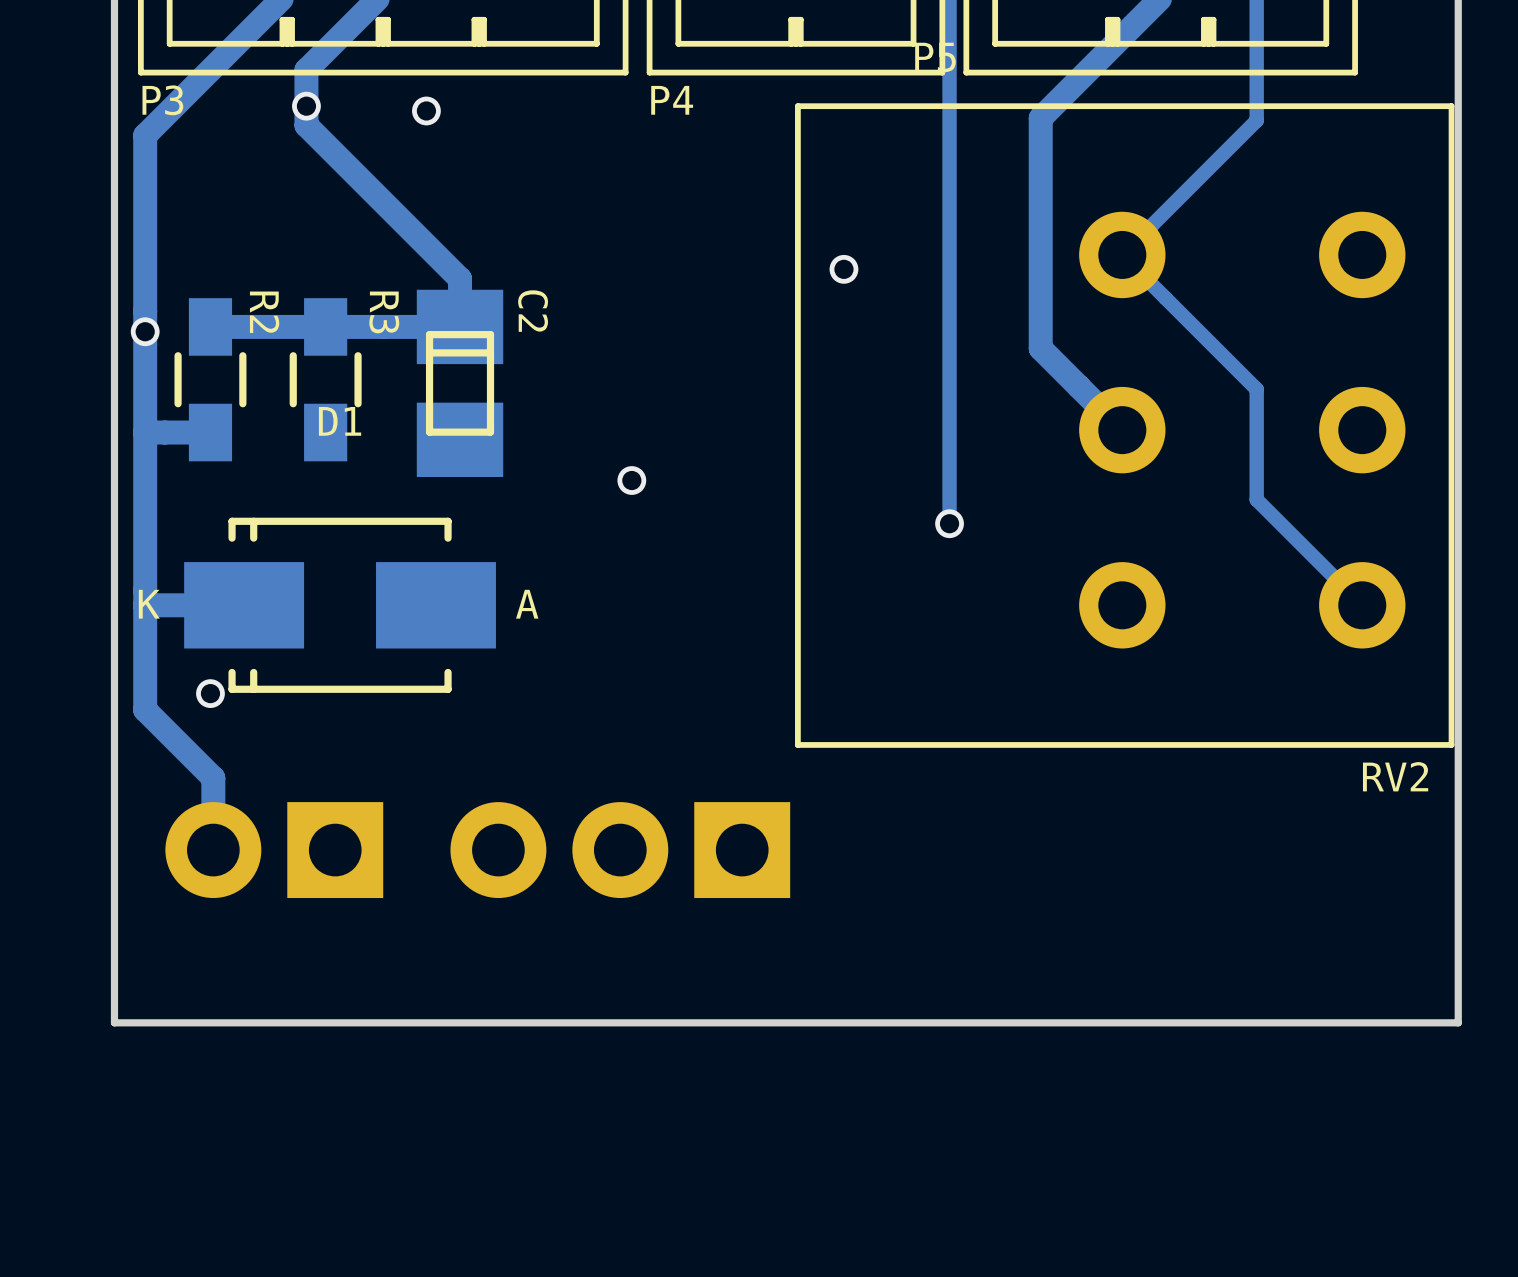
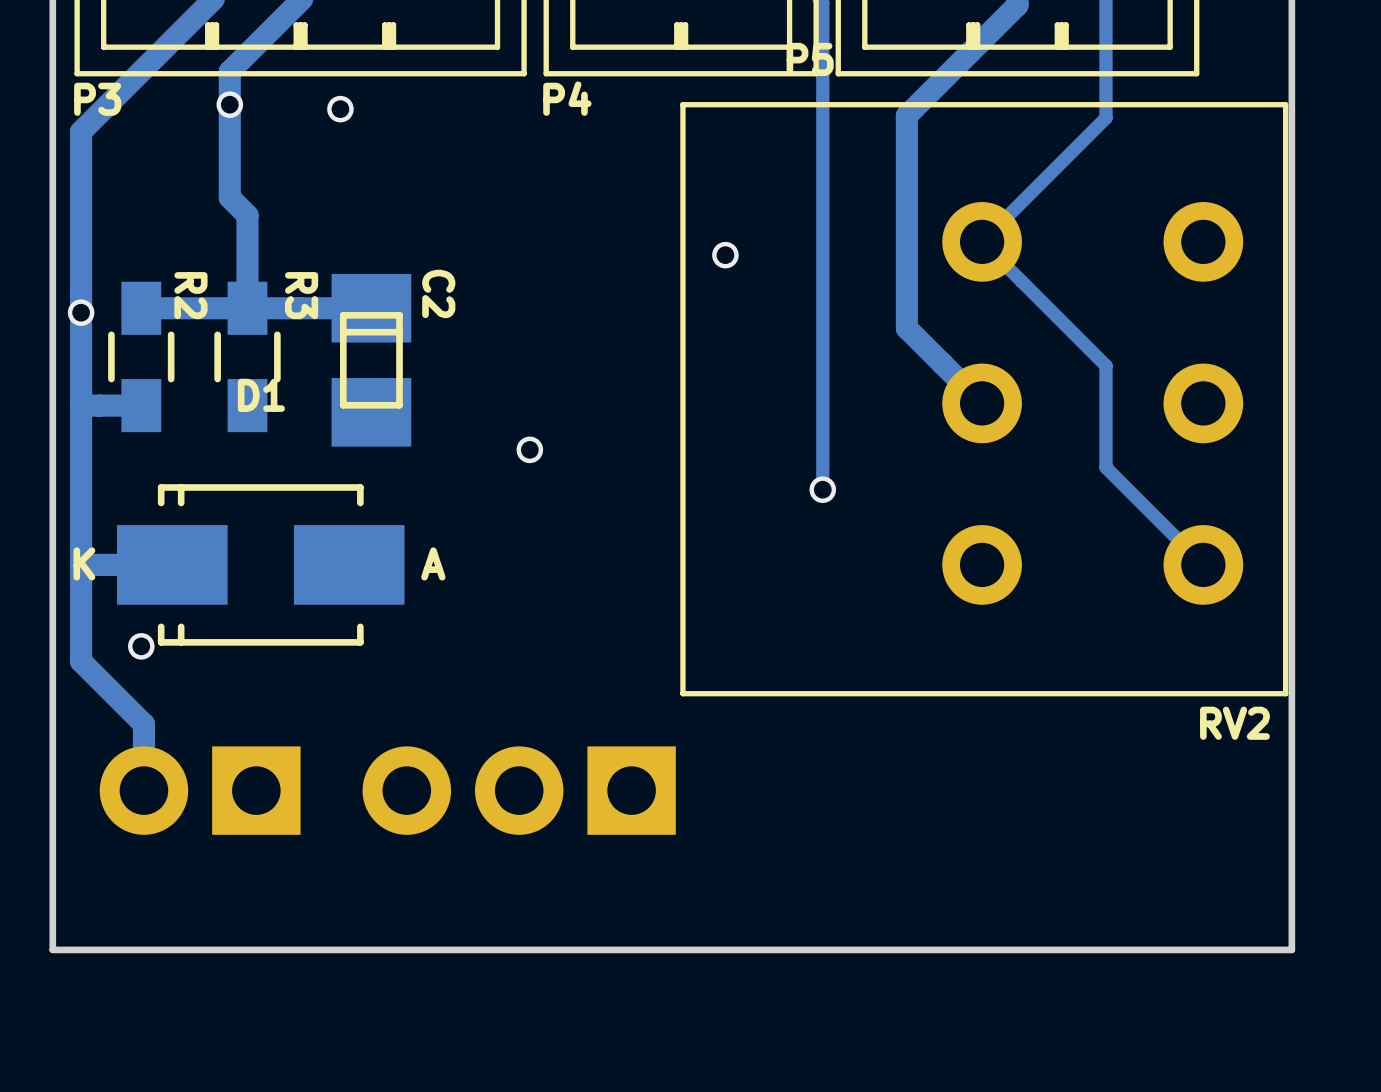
track: (306, 125) (460, 278) (460, 326) -> (229, 122) (229, 197) (247, 215) (247, 308)

